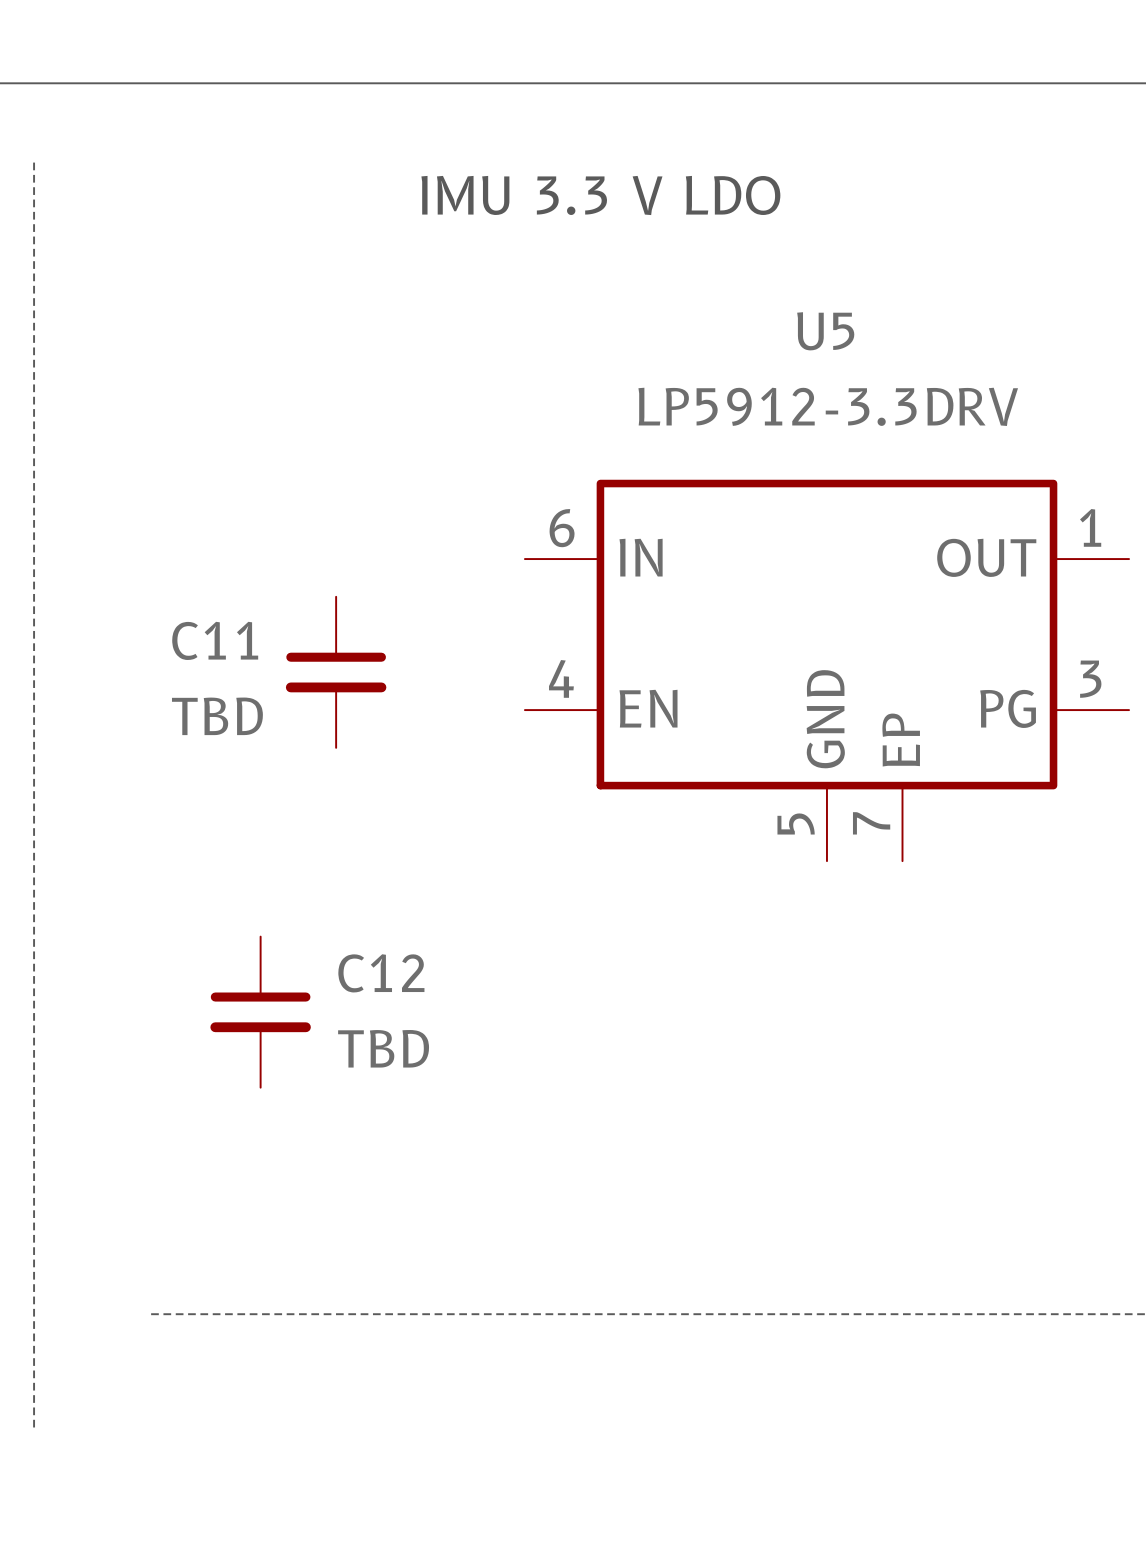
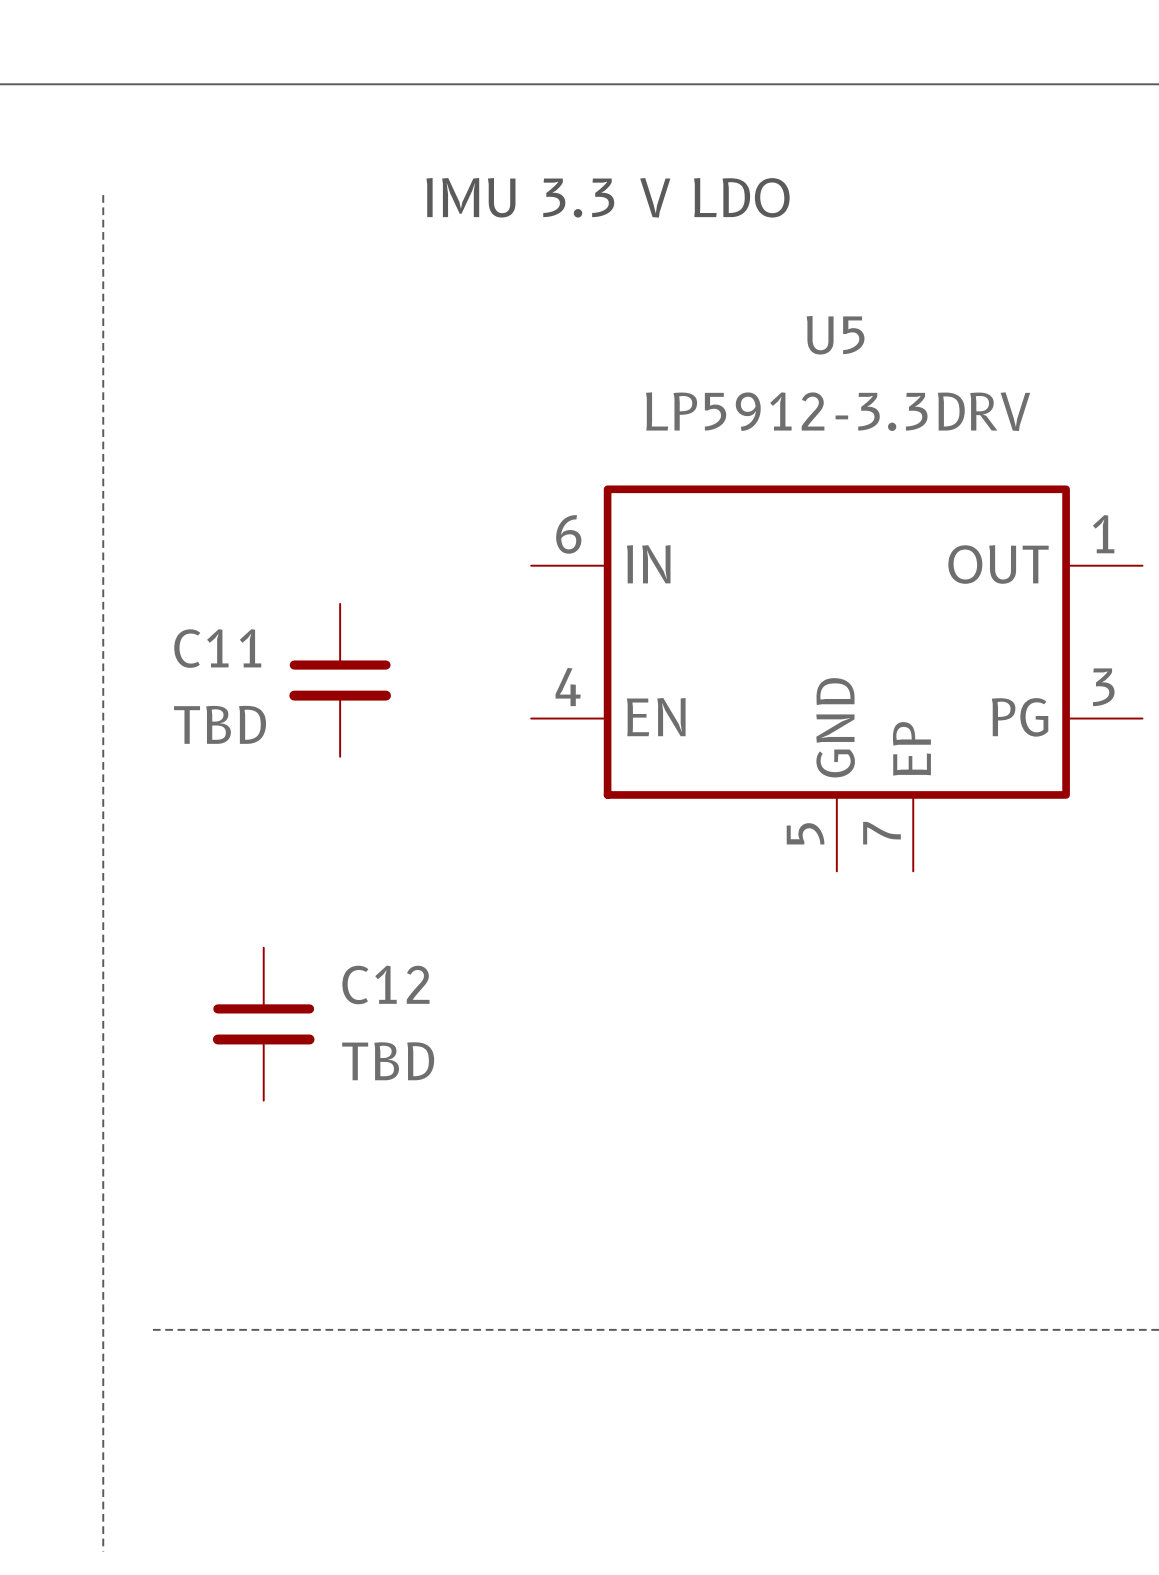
line: (34, 162) (34, 1427) -> none
line: none -> (103, 195) (103, 1551)

